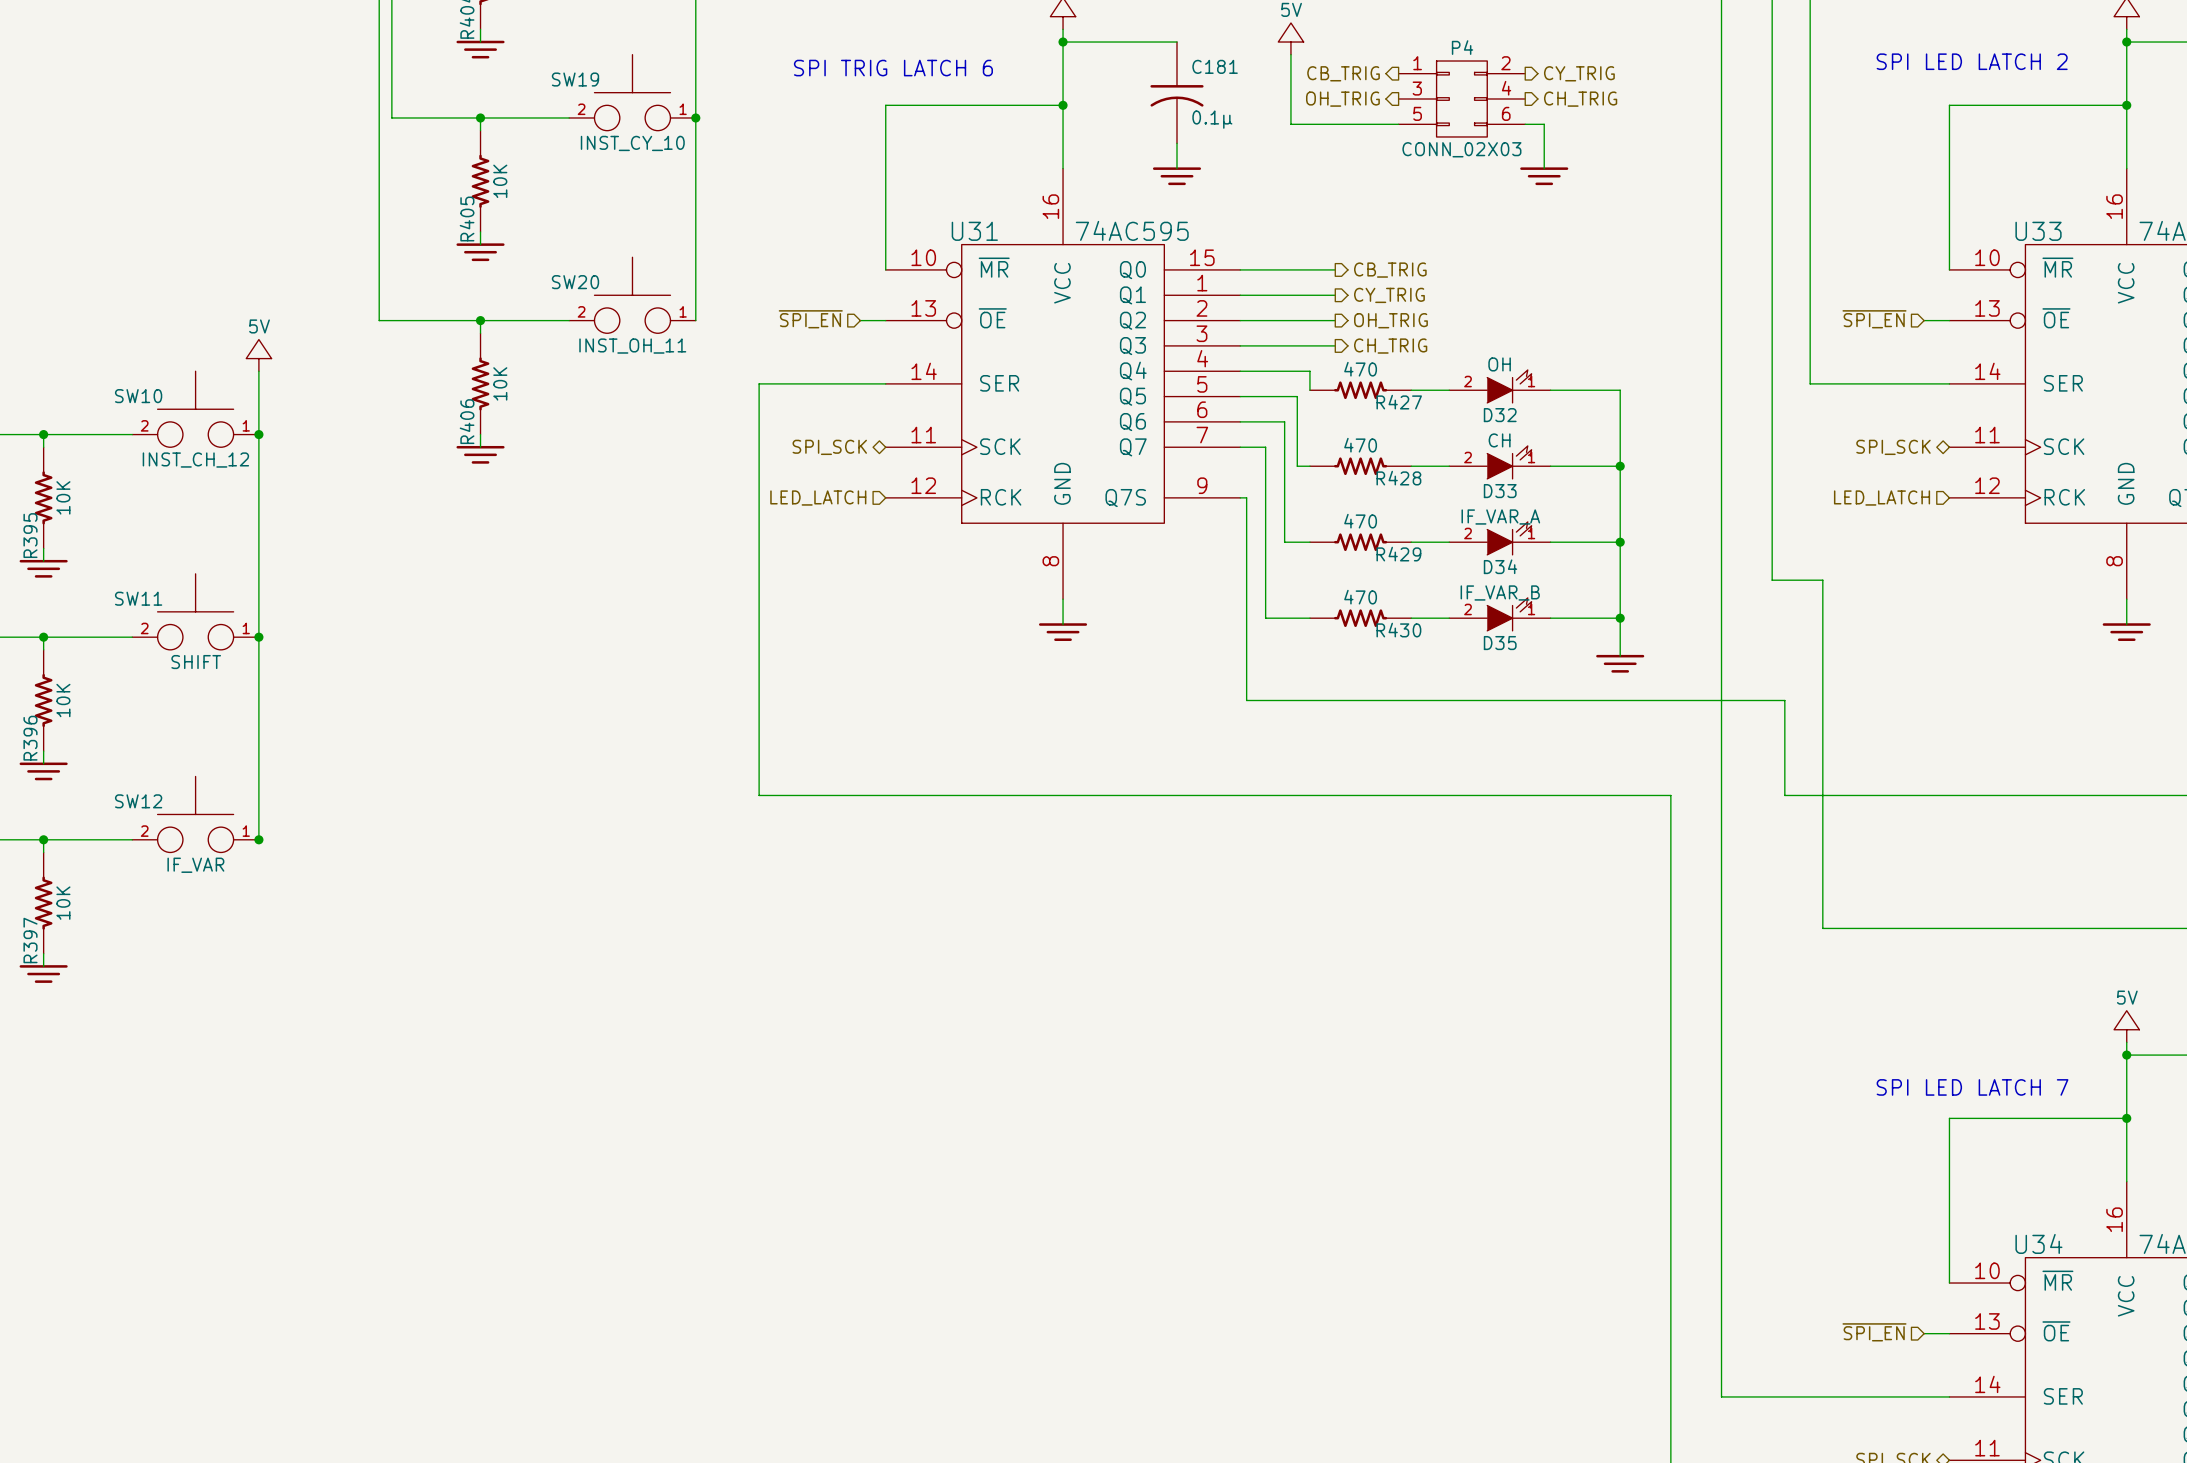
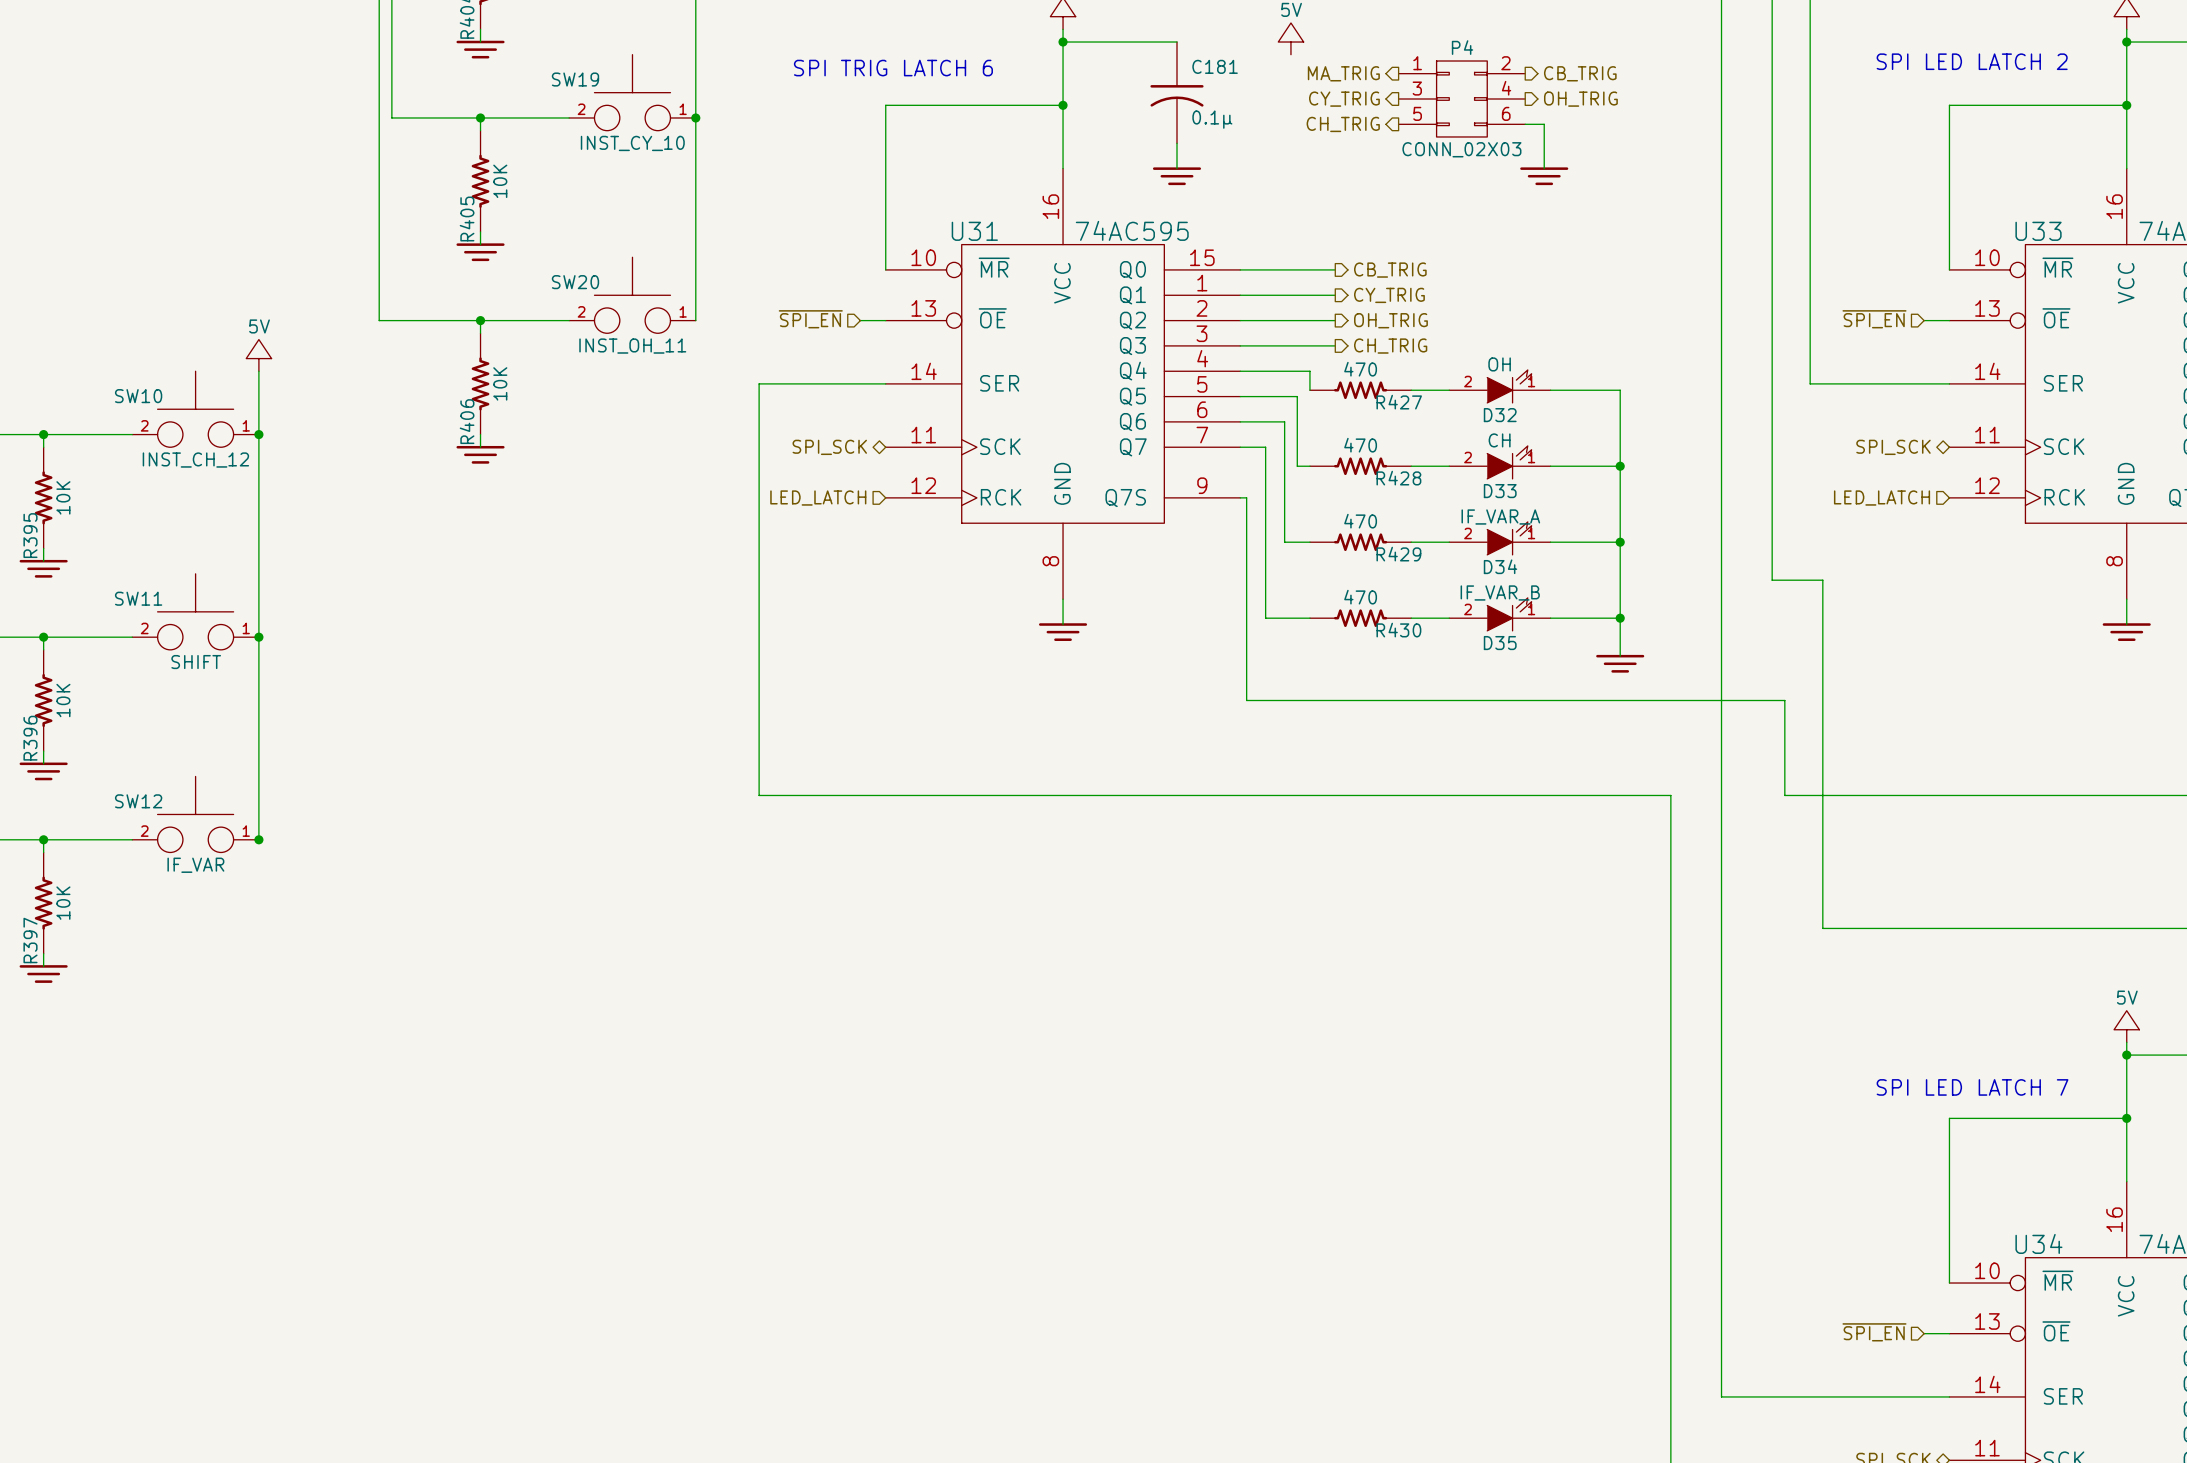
wire: (1290, 54) (1290, 124) (1398, 124) -> none
hierarchical label: CB_TRIG (1343, 73) -> MA_TRIG (1343, 73)
hierarchical label: CY_TRIG (1579, 73) -> CB_TRIG (1580, 73)
hierarchical label: OH_TRIG (1342, 99) -> CY_TRIG (1344, 99)
hierarchical label: CH_TRIG (1580, 99) -> OH_TRIG (1580, 99)
hierarchical label: none -> CH_TRIG (1343, 124)

